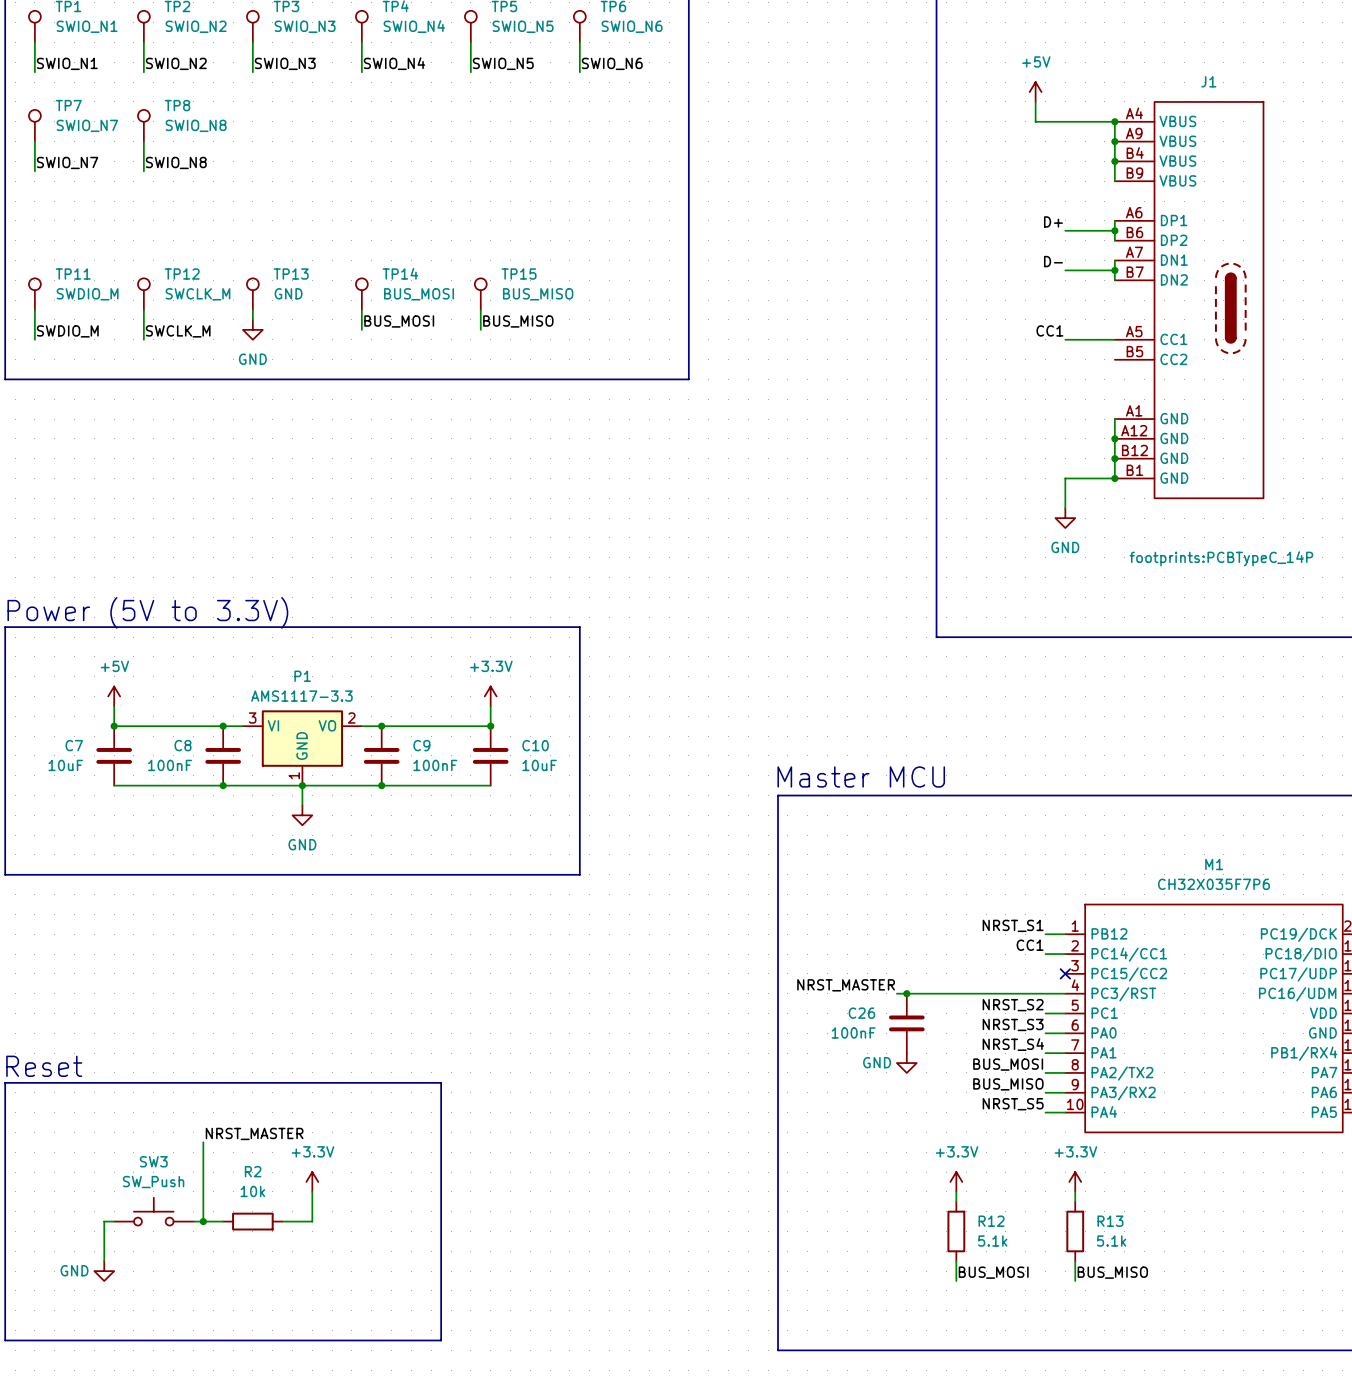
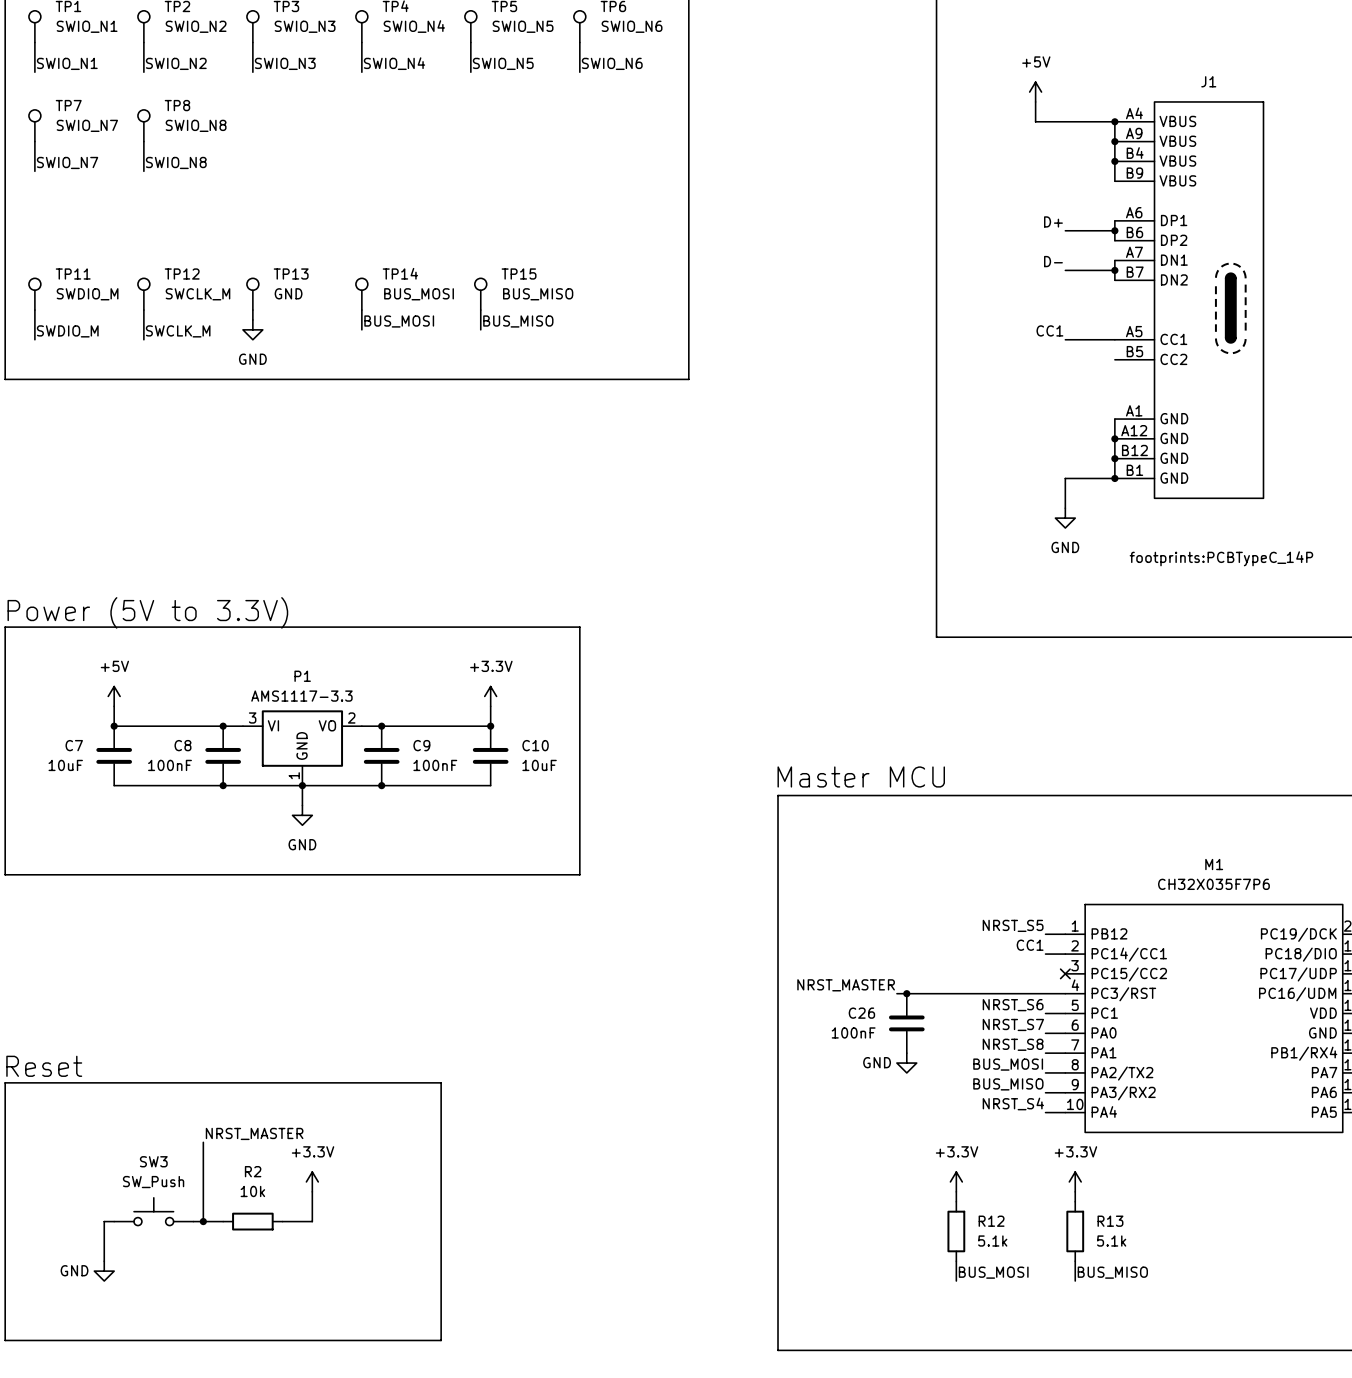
label: NRST_S1 (1013, 925) -> NRST_S5 (1013, 925)
label: NRST_S2 (1013, 1005) -> NRST_S6 (1013, 1005)
label: NRST_S3 (1013, 1024) -> NRST_S7 (1013, 1024)
label: NRST_S4 (1013, 1044) -> NRST_S8 (1013, 1044)
label: NRST_S5 (1013, 1104) -> NRST_S4 (1013, 1103)

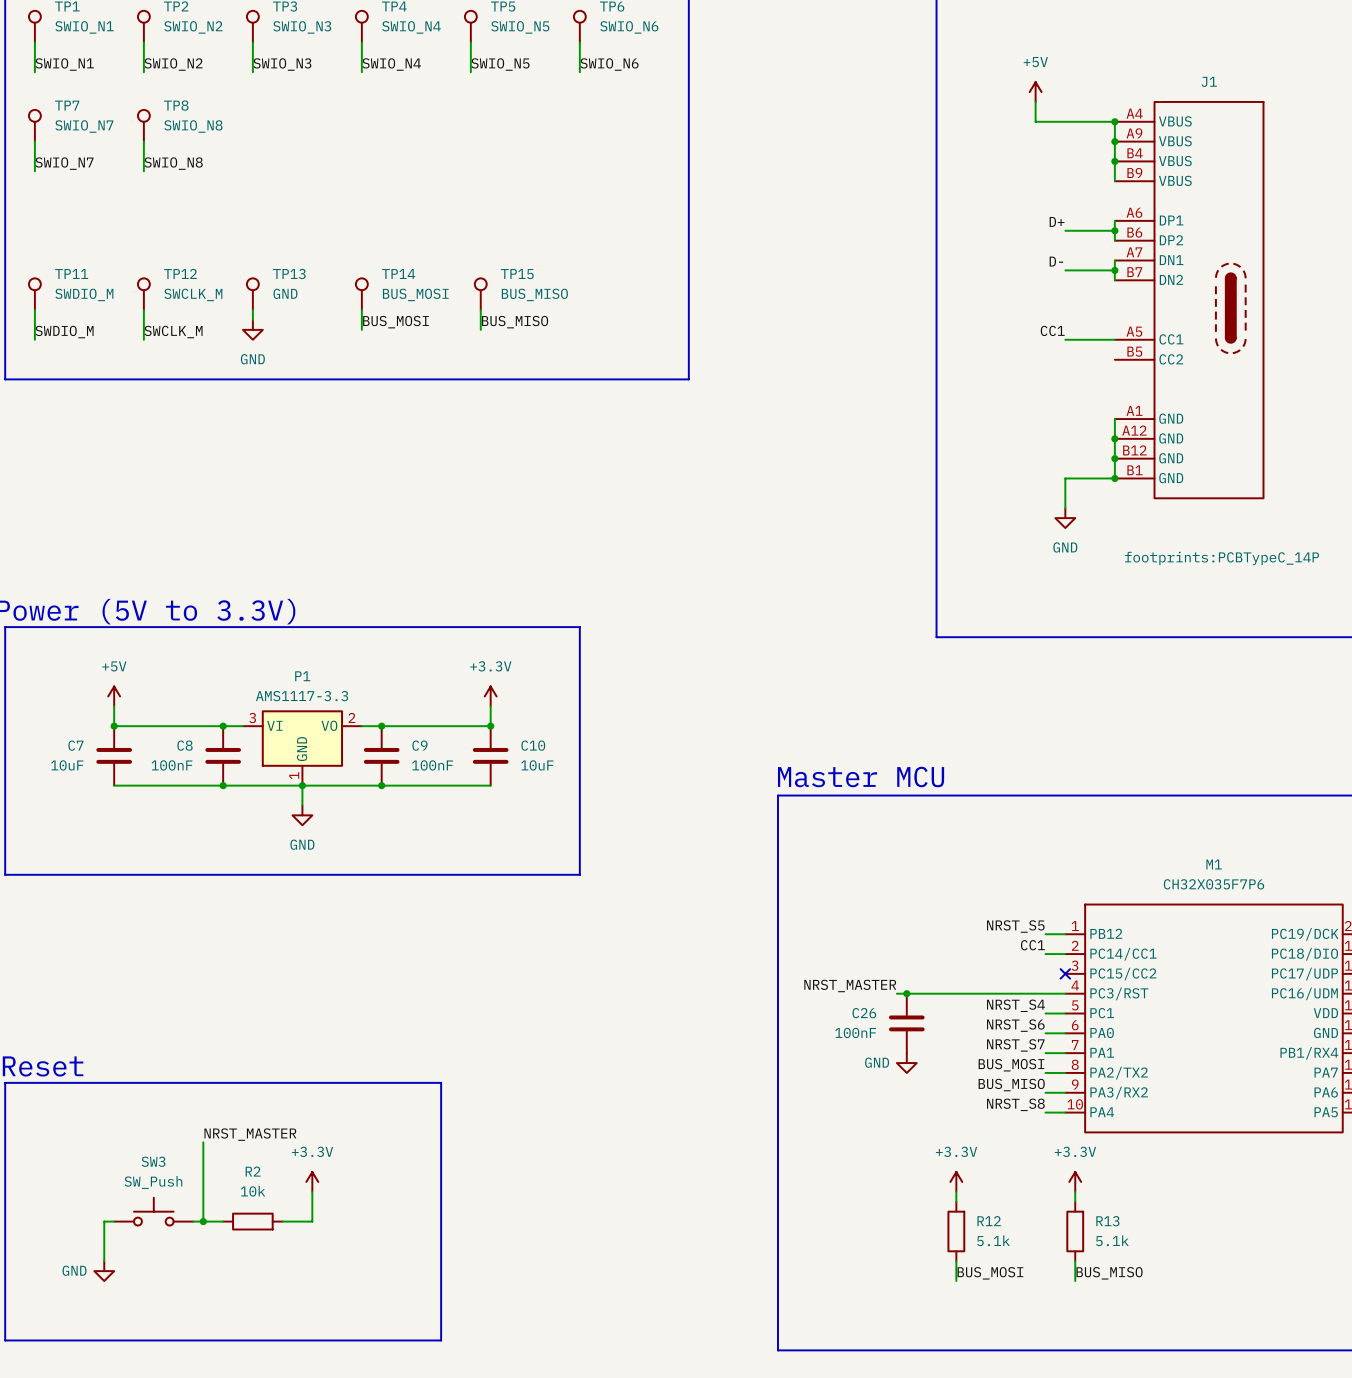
label: NRST_S6 (1013, 1005) -> NRST_S4 (1016, 1005)
label: NRST_S7 (1013, 1024) -> NRST_S6 (1015, 1025)
label: NRST_S8 (1013, 1044) -> NRST_S7 (1015, 1045)
label: NRST_S4 (1013, 1103) -> NRST_S8 (1015, 1104)

